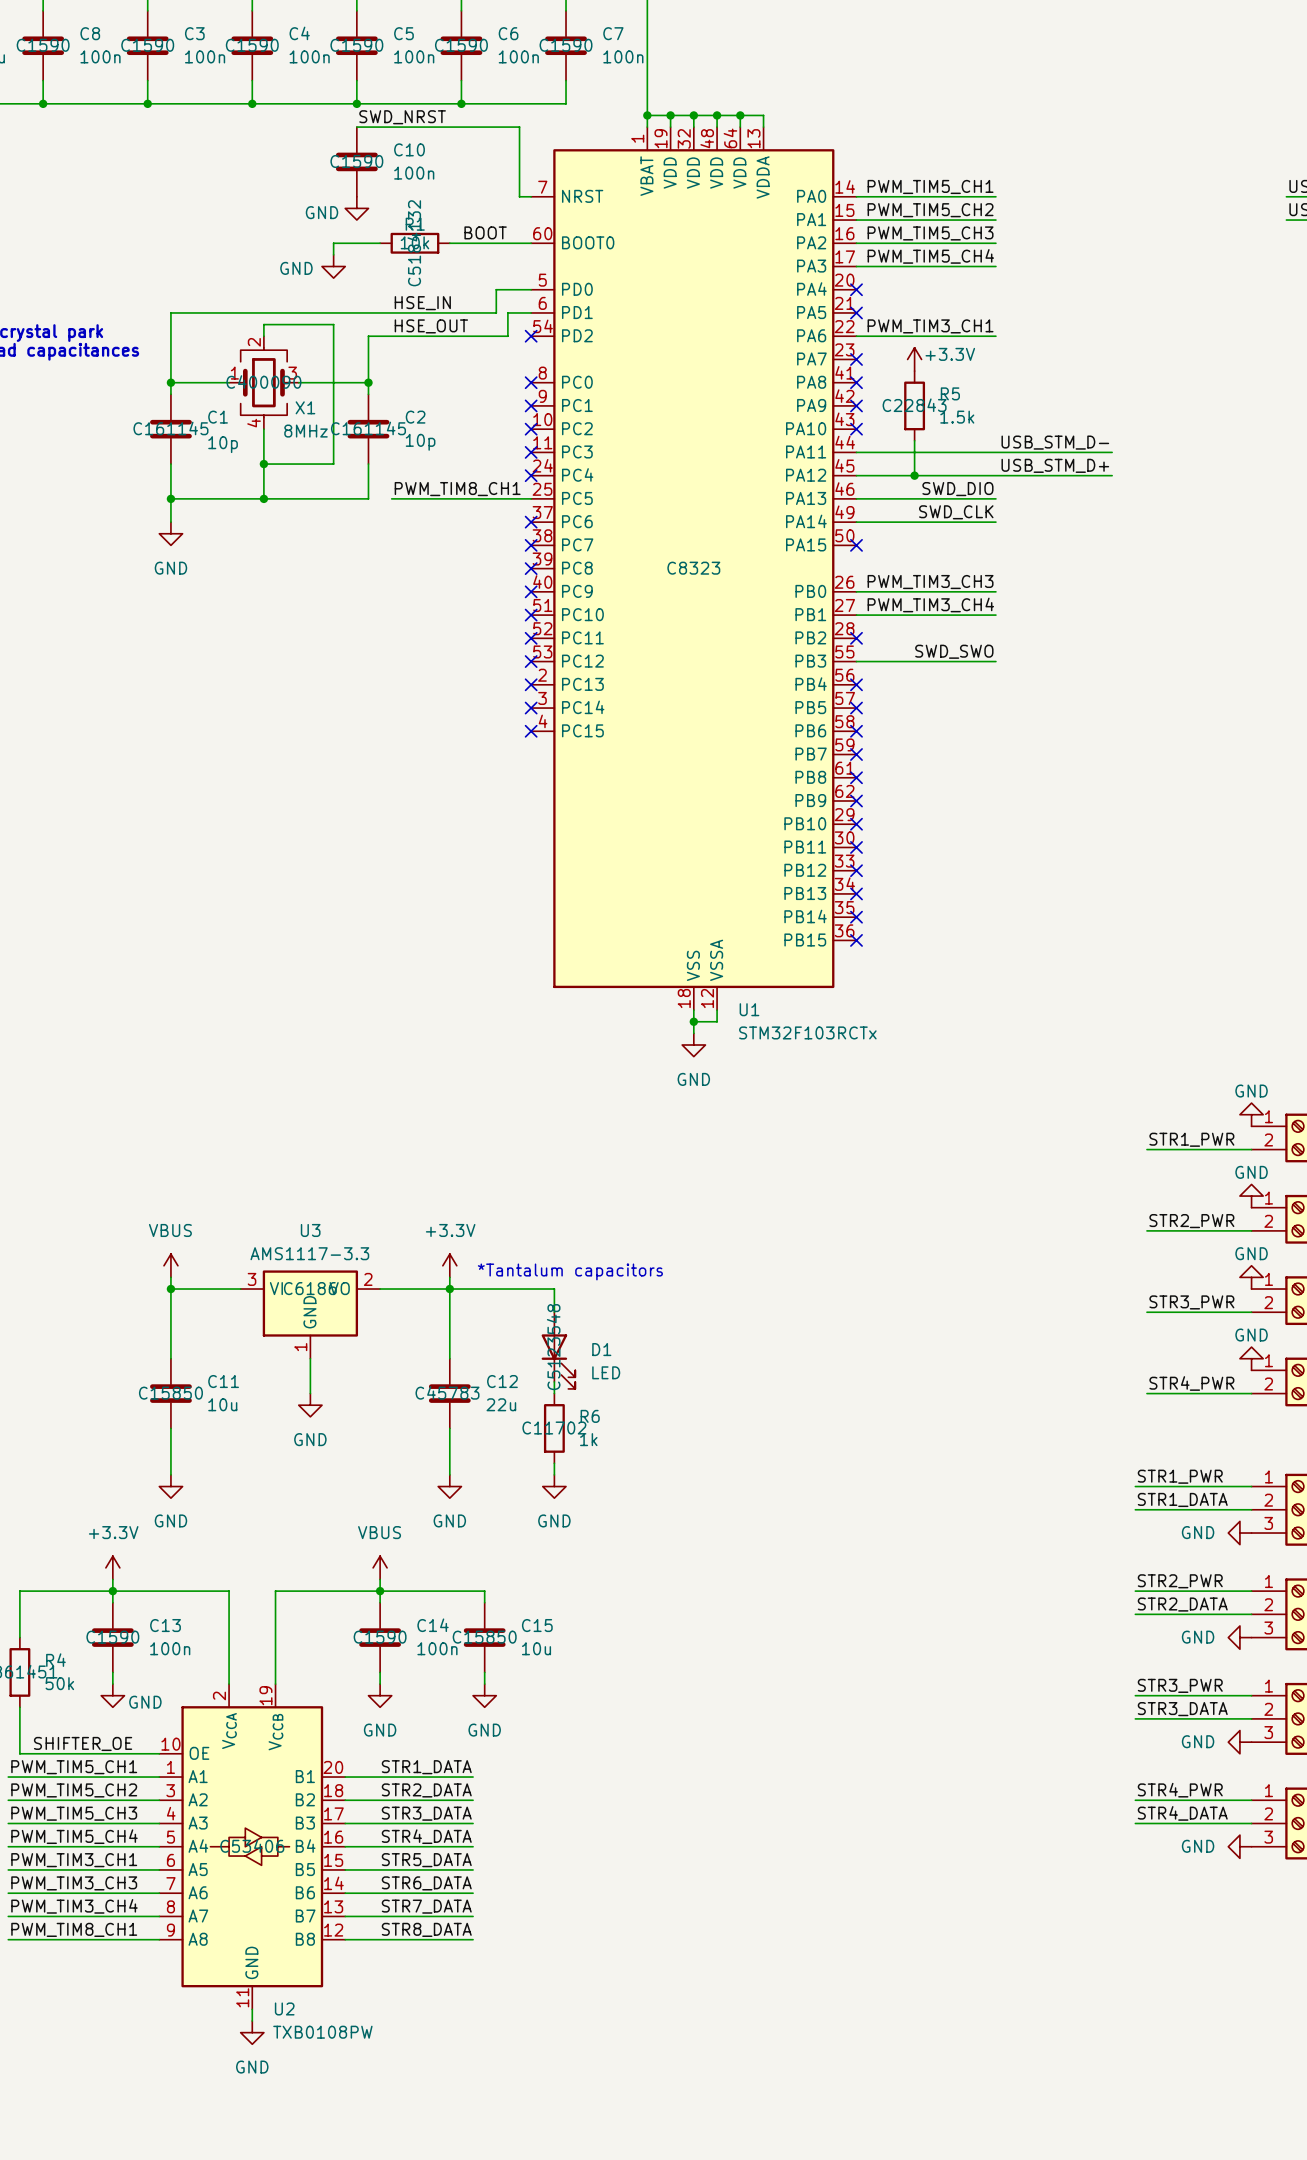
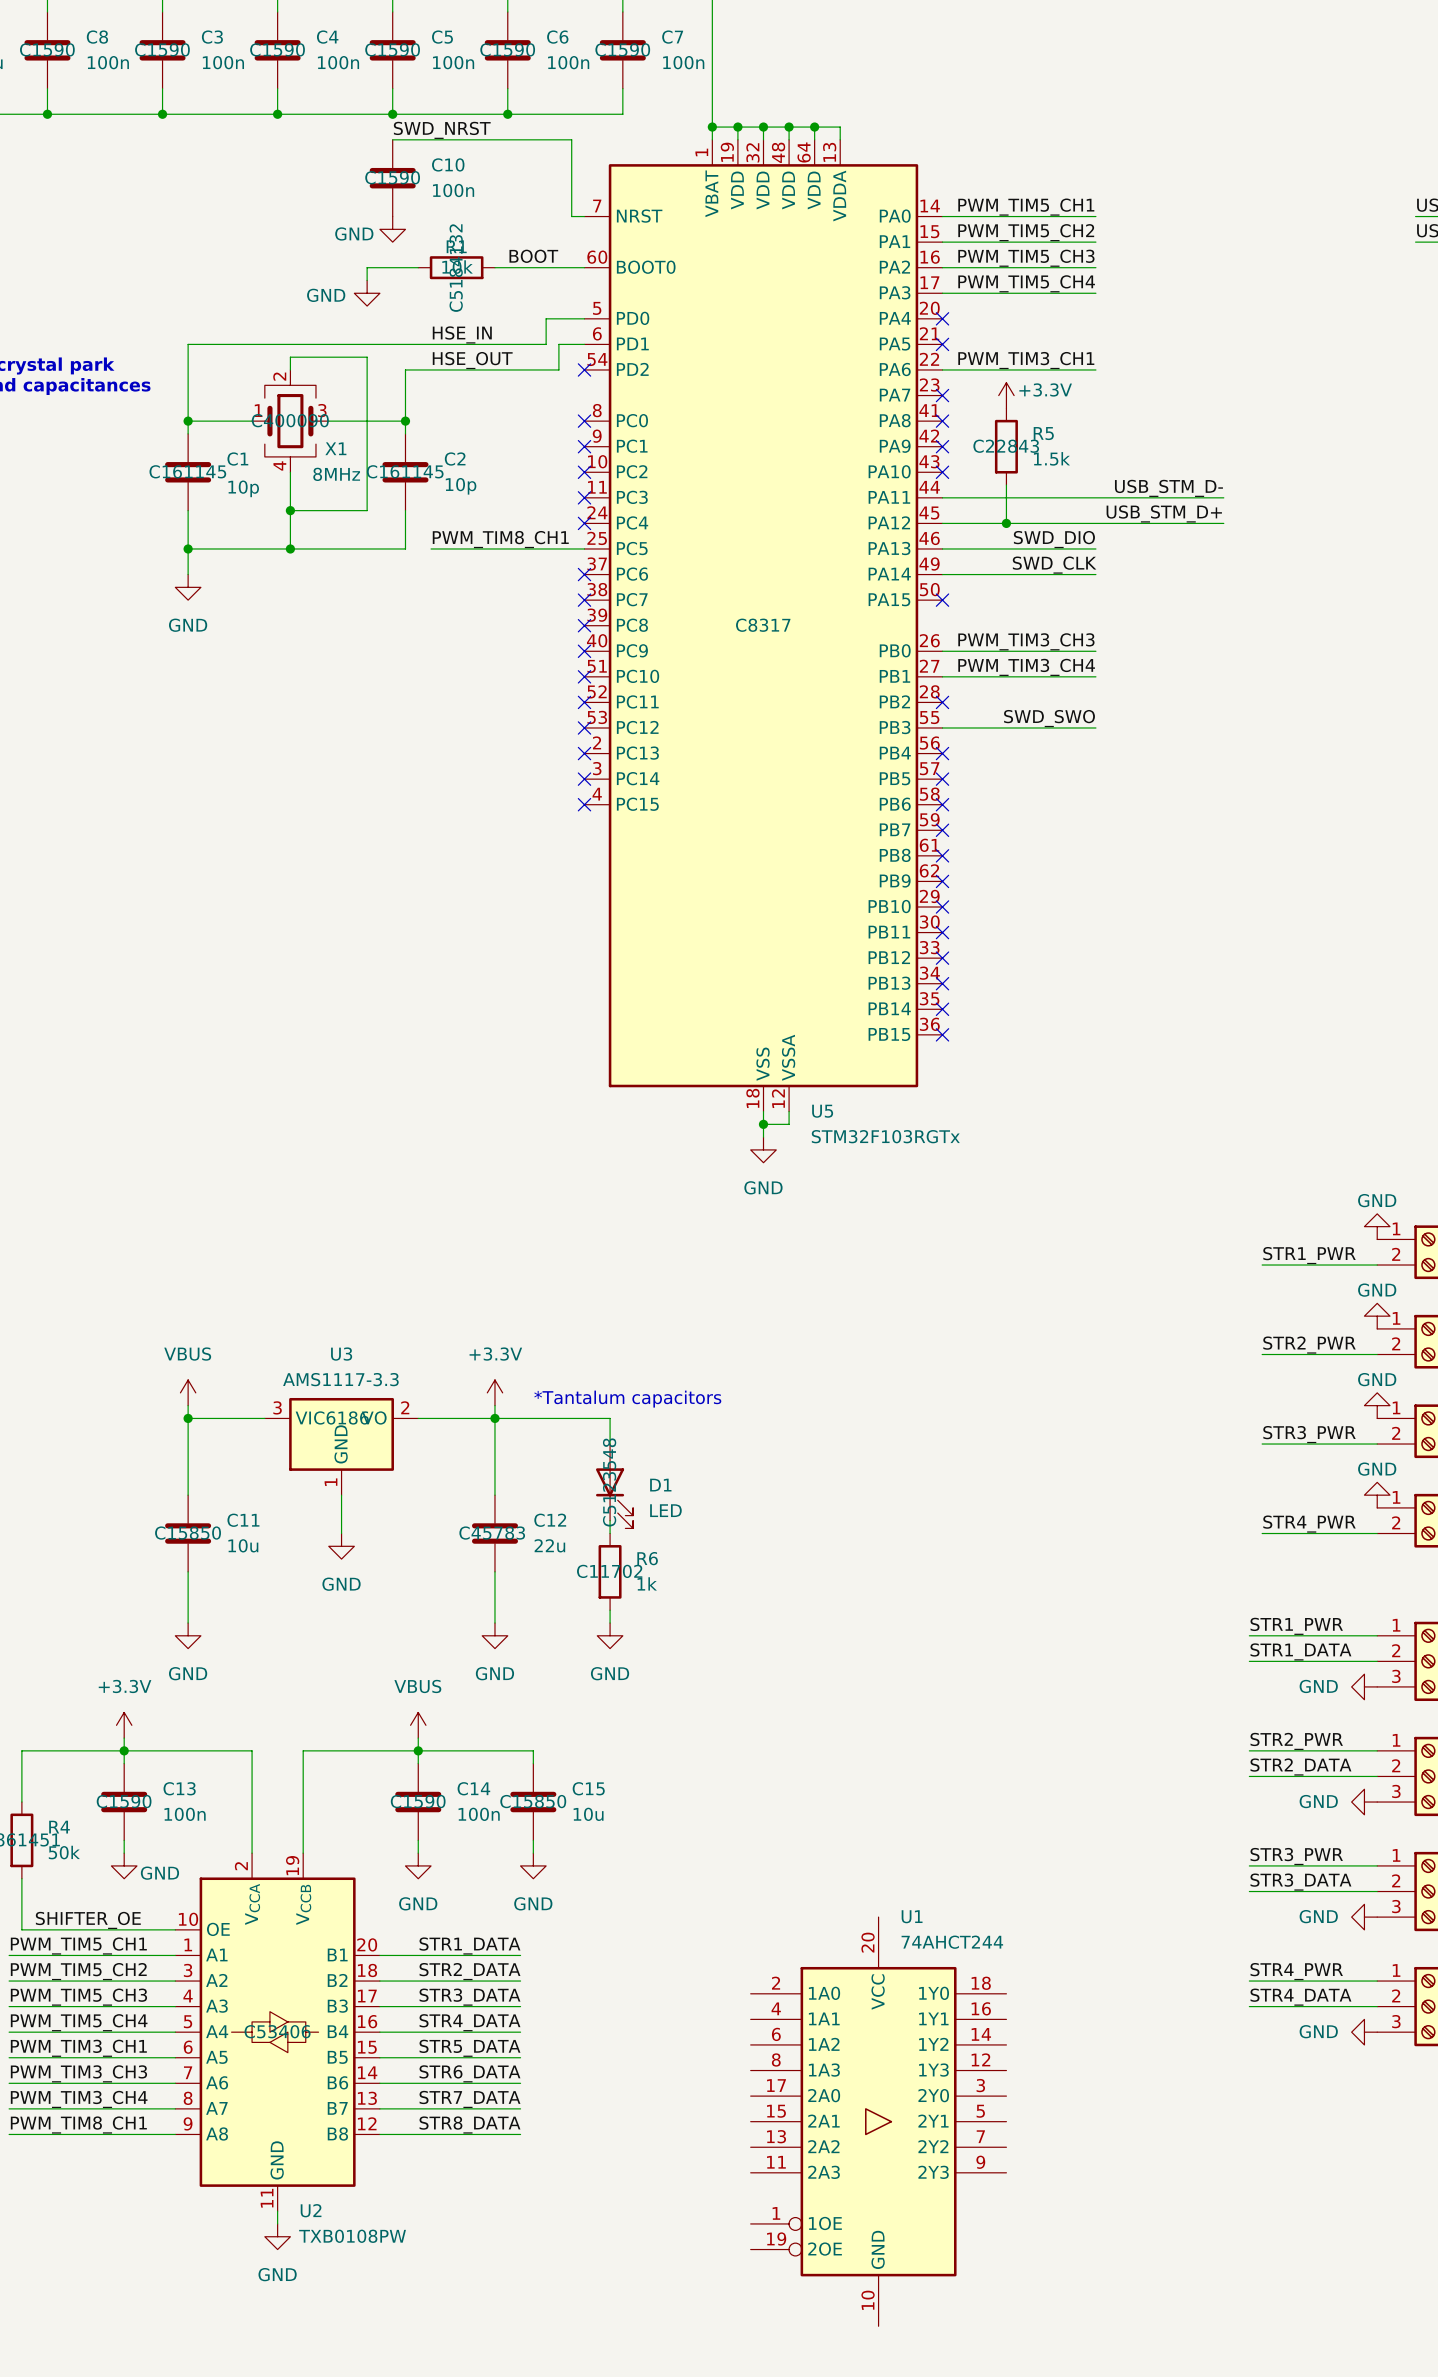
U1 text: C8323 (693, 568) -> C8317 (763, 625)
U1 name: U1 (749, 1009) -> U5 (822, 1111)
U1 value: STM32F103RCTx (807, 1032) -> STM32F103RGTx (885, 1136)
U1: none -> 74AHCT244 (878, 2121)

